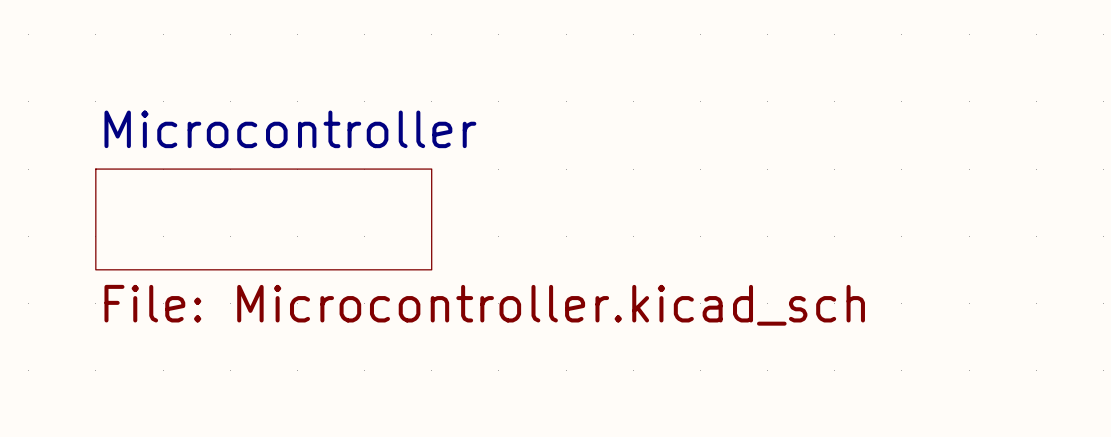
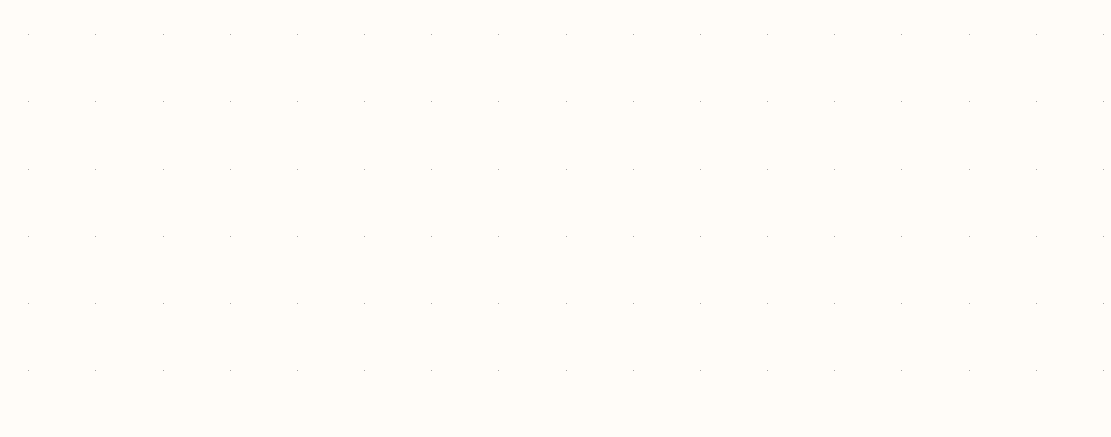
sheet Microcontroller: File: Microcontroller.kicad_sch (263, 219) -> none

